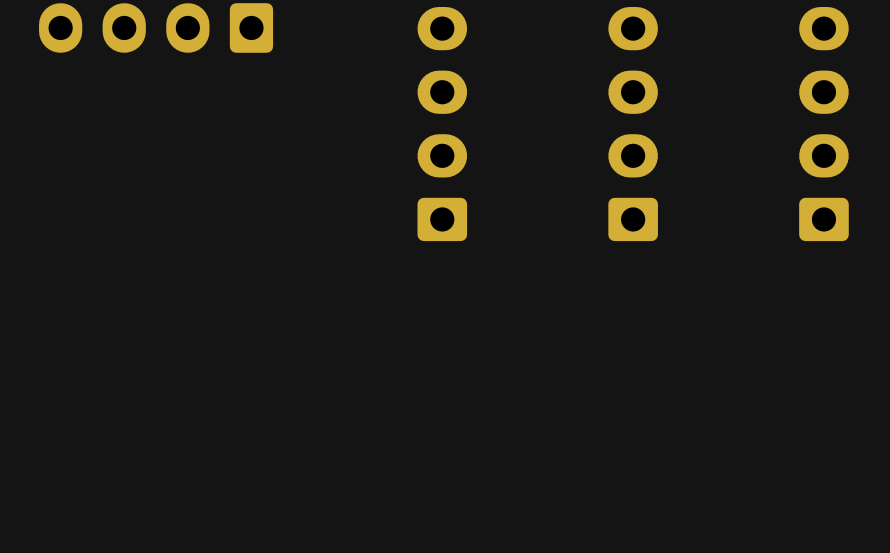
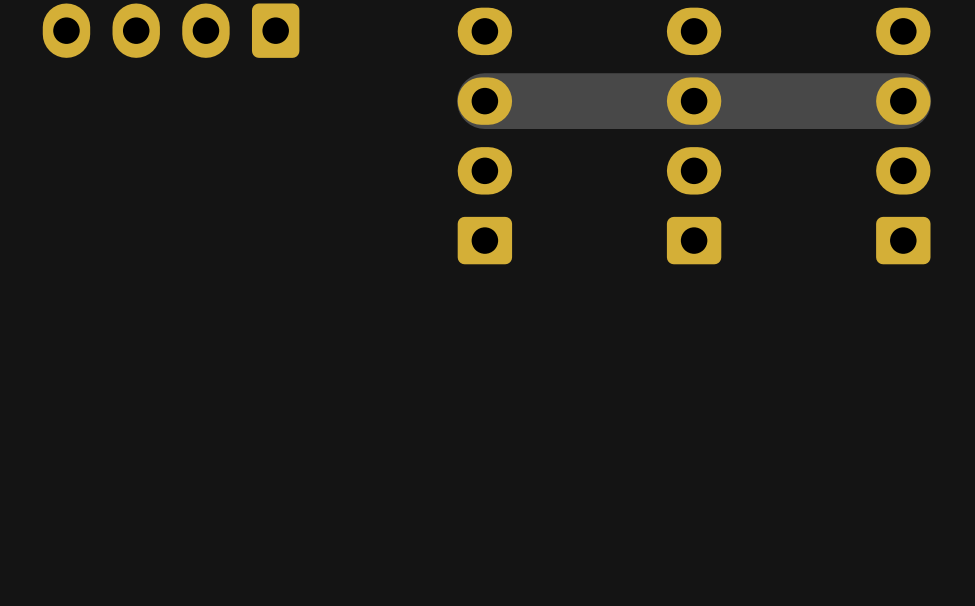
track: none -> (903, 101) (484, 101)

